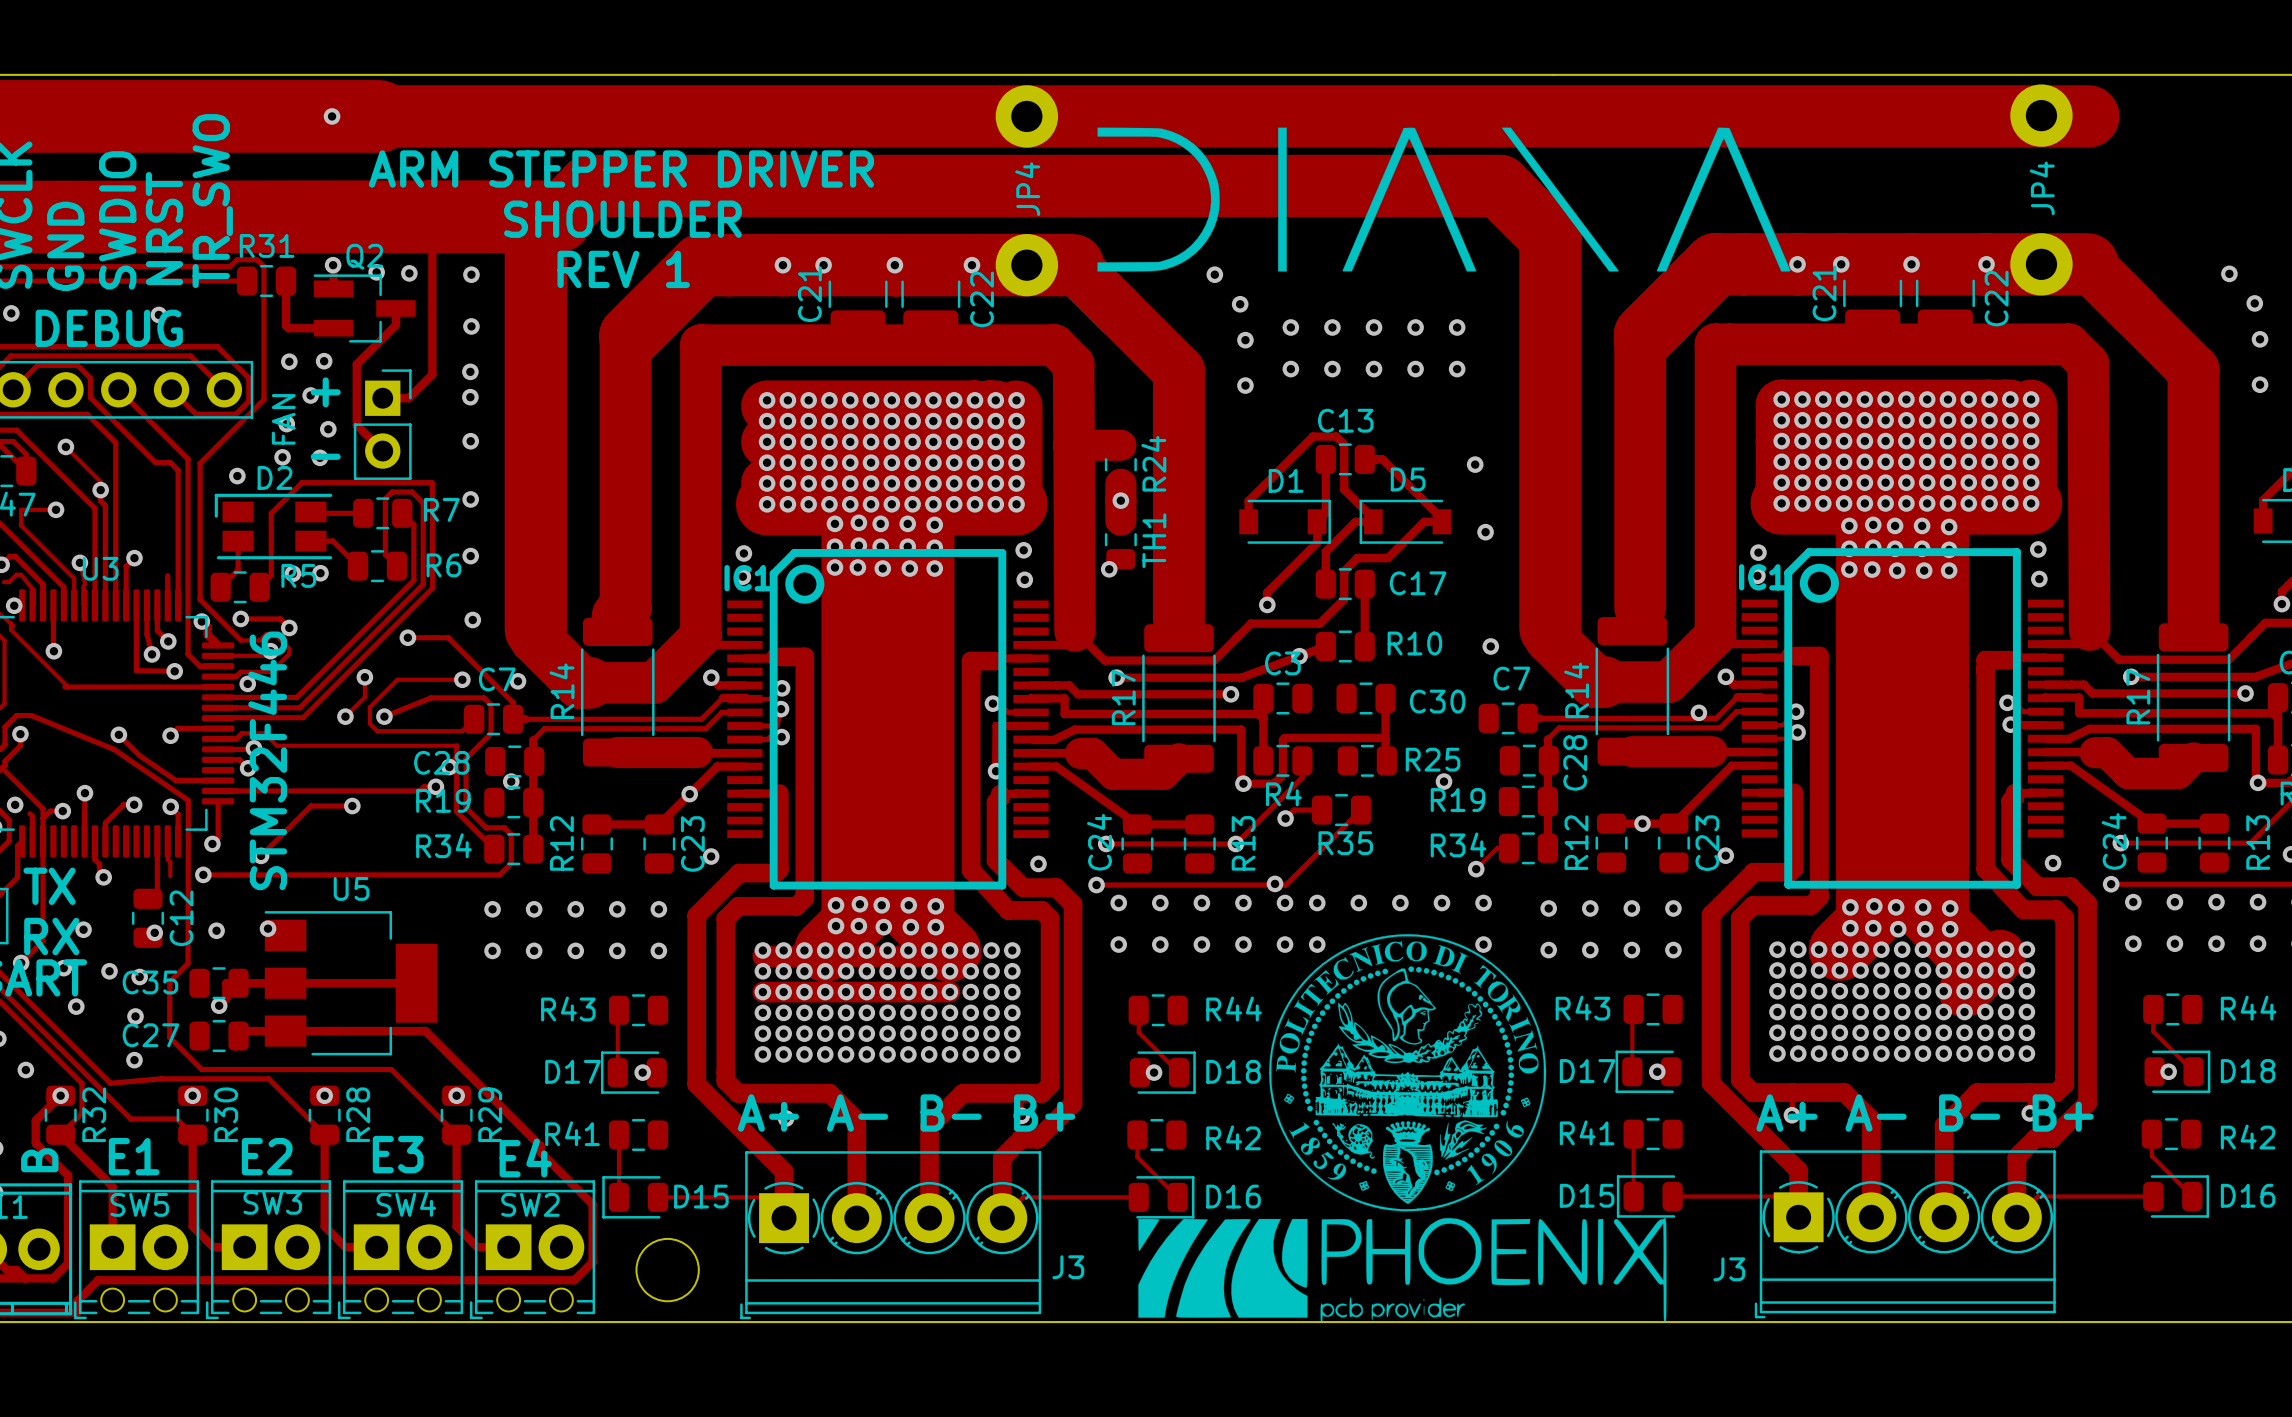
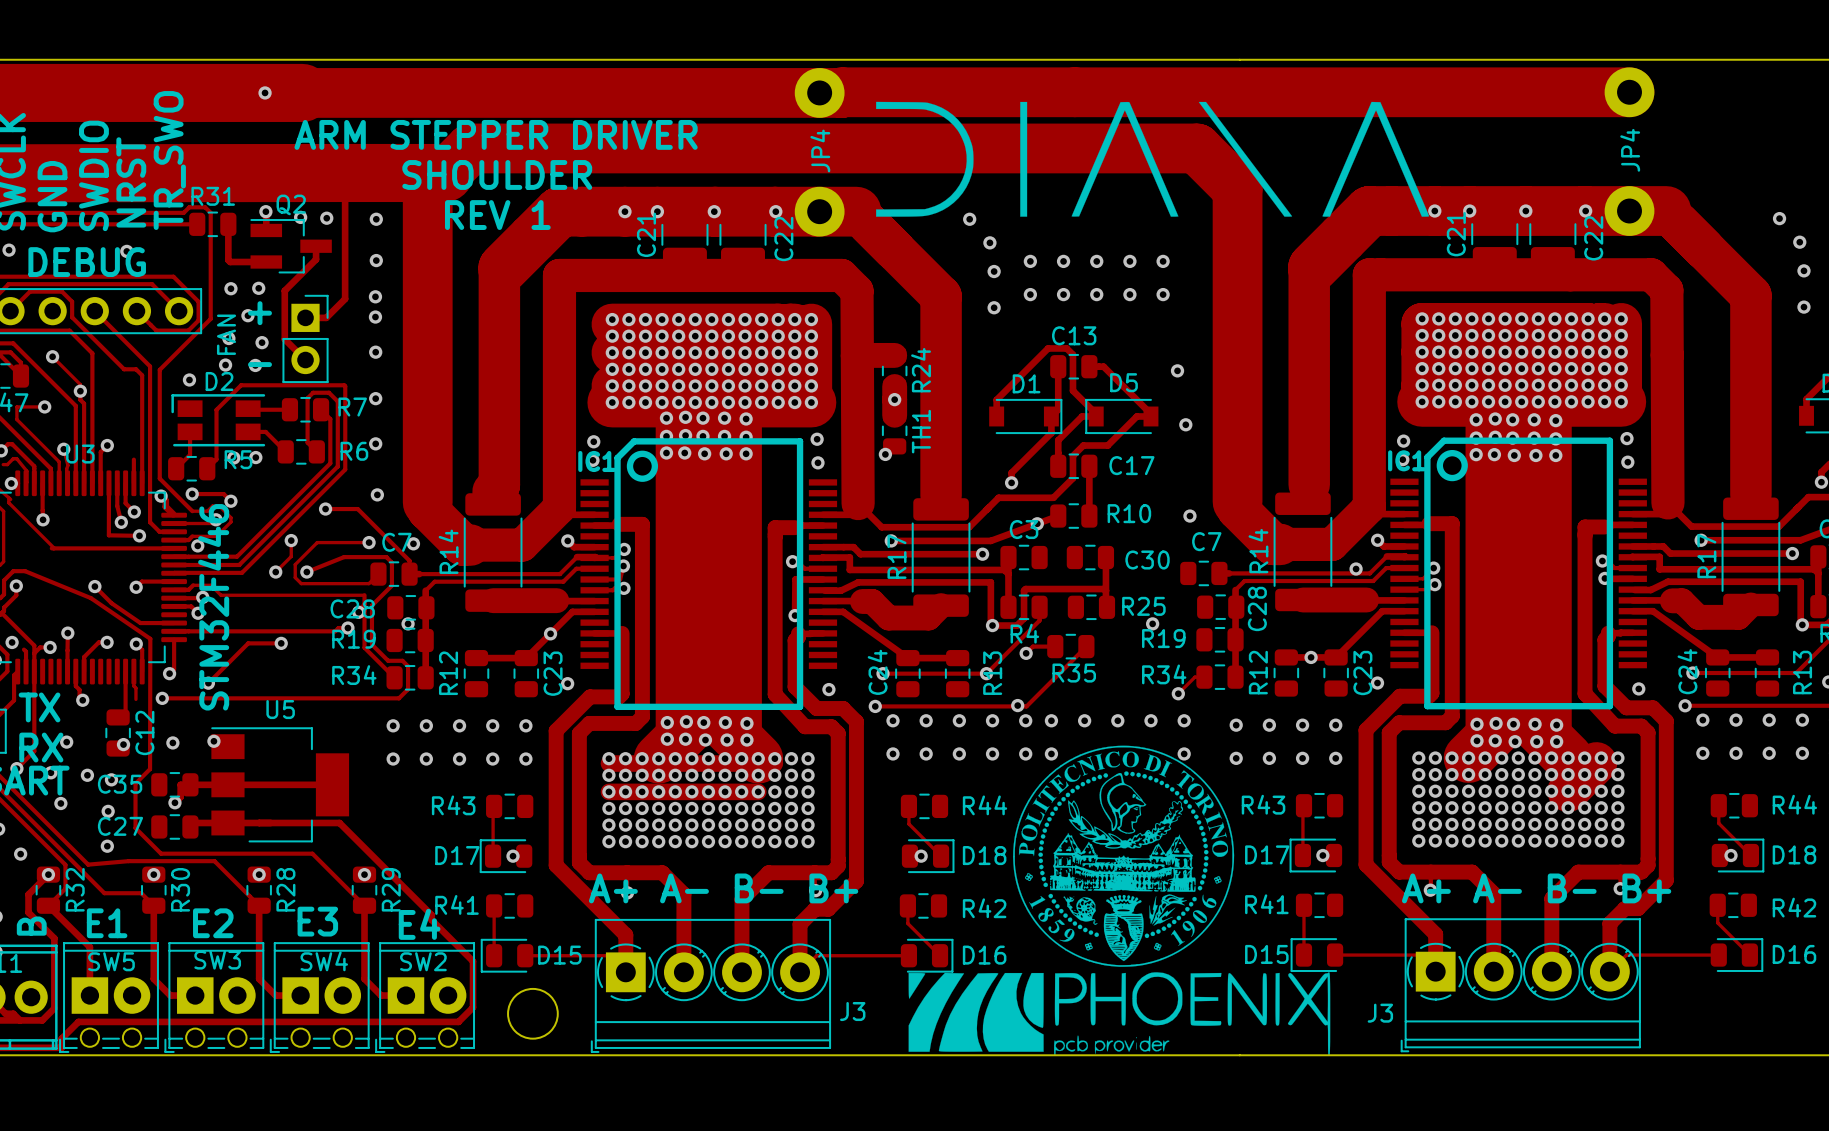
track: (1054, 116) (2088, 116) -> (841, 92) (1629, 92)

